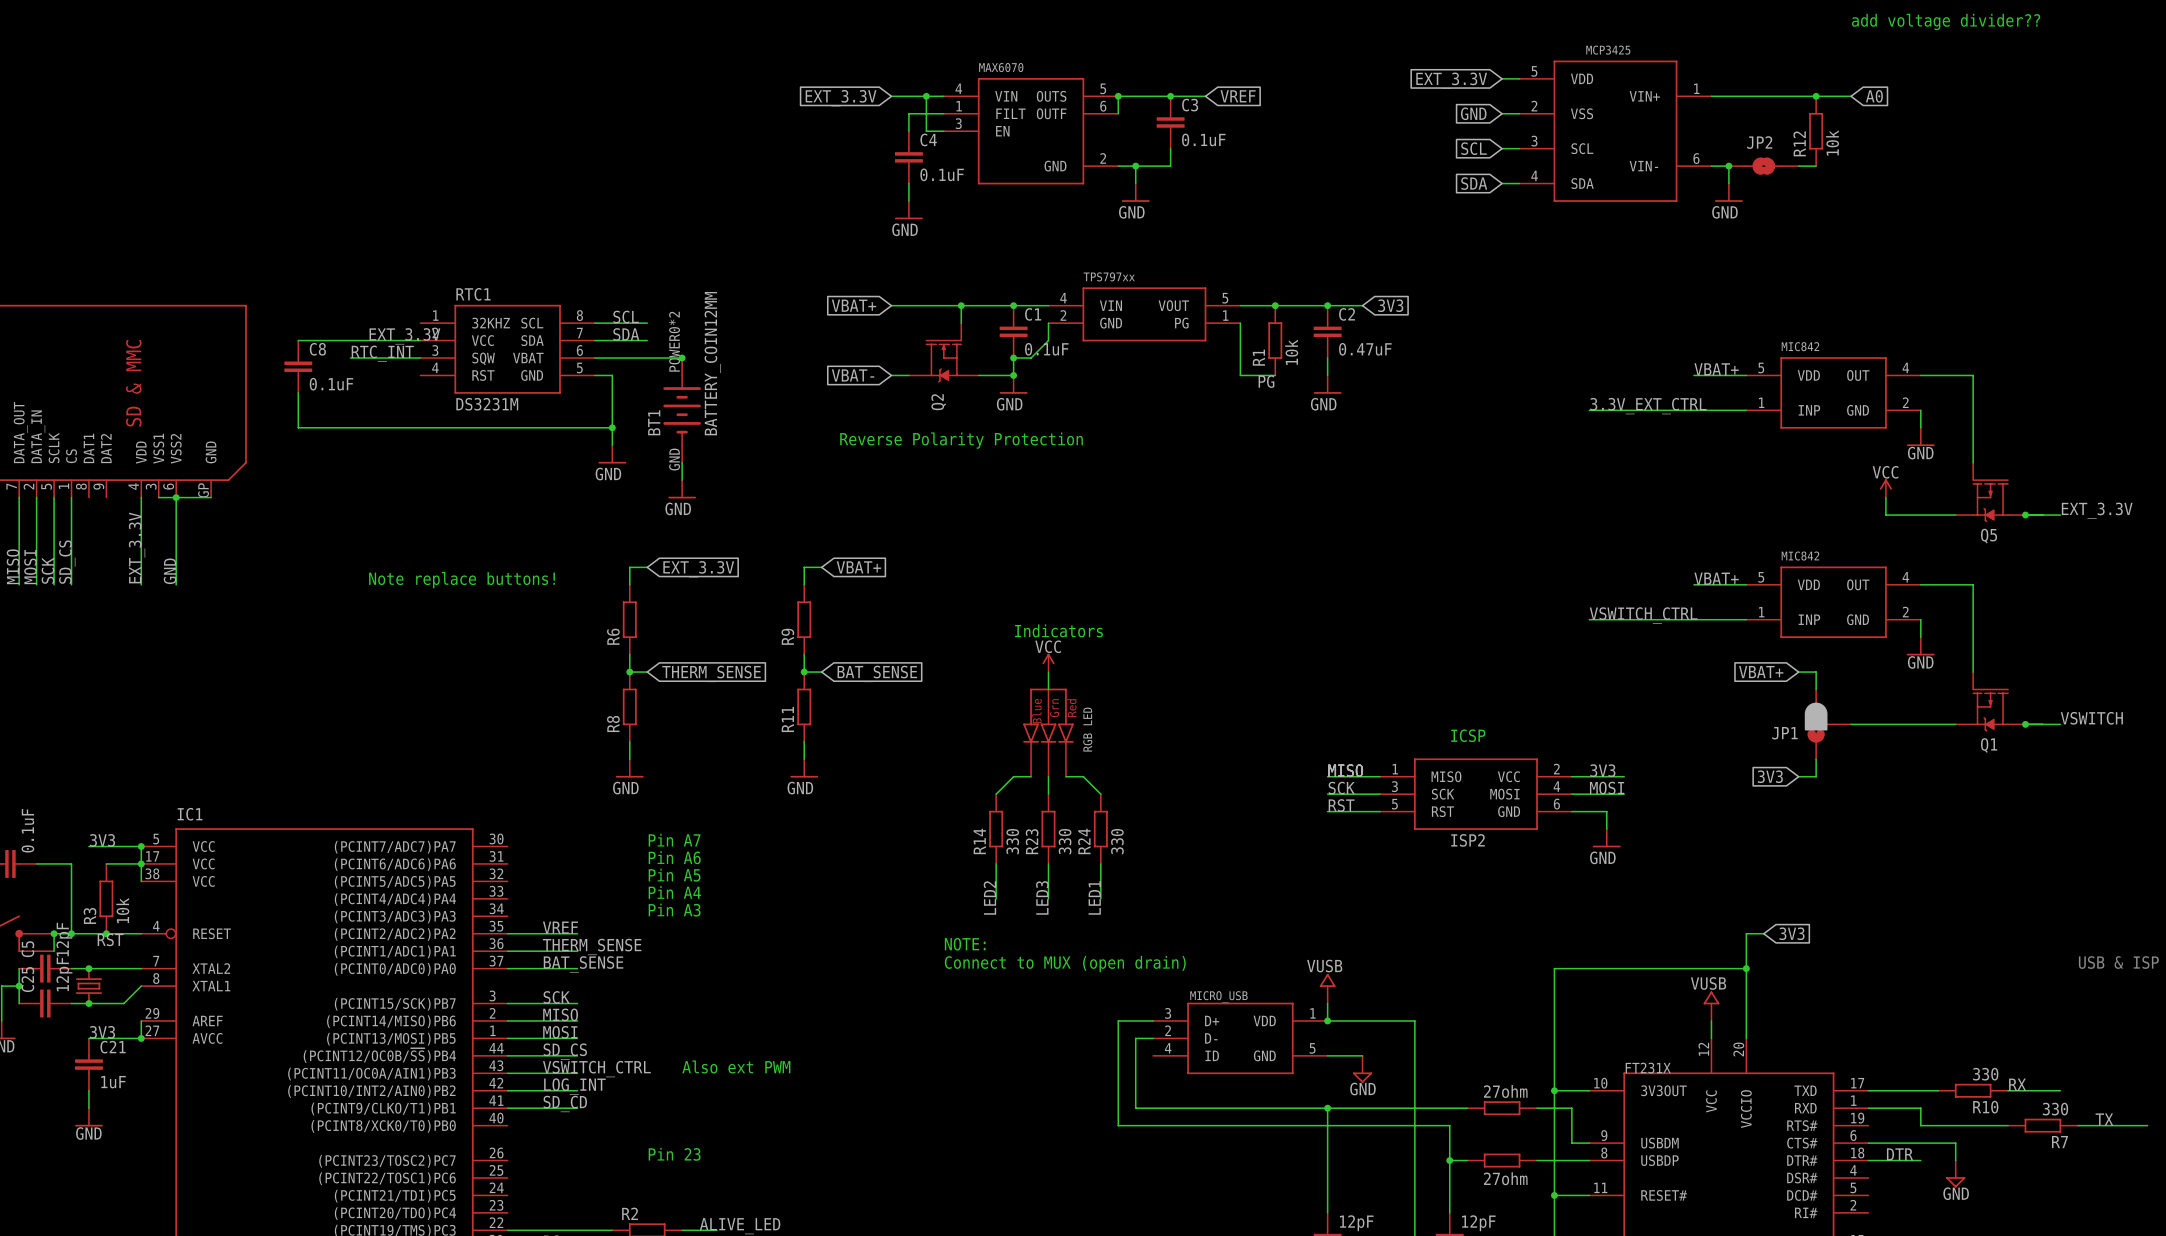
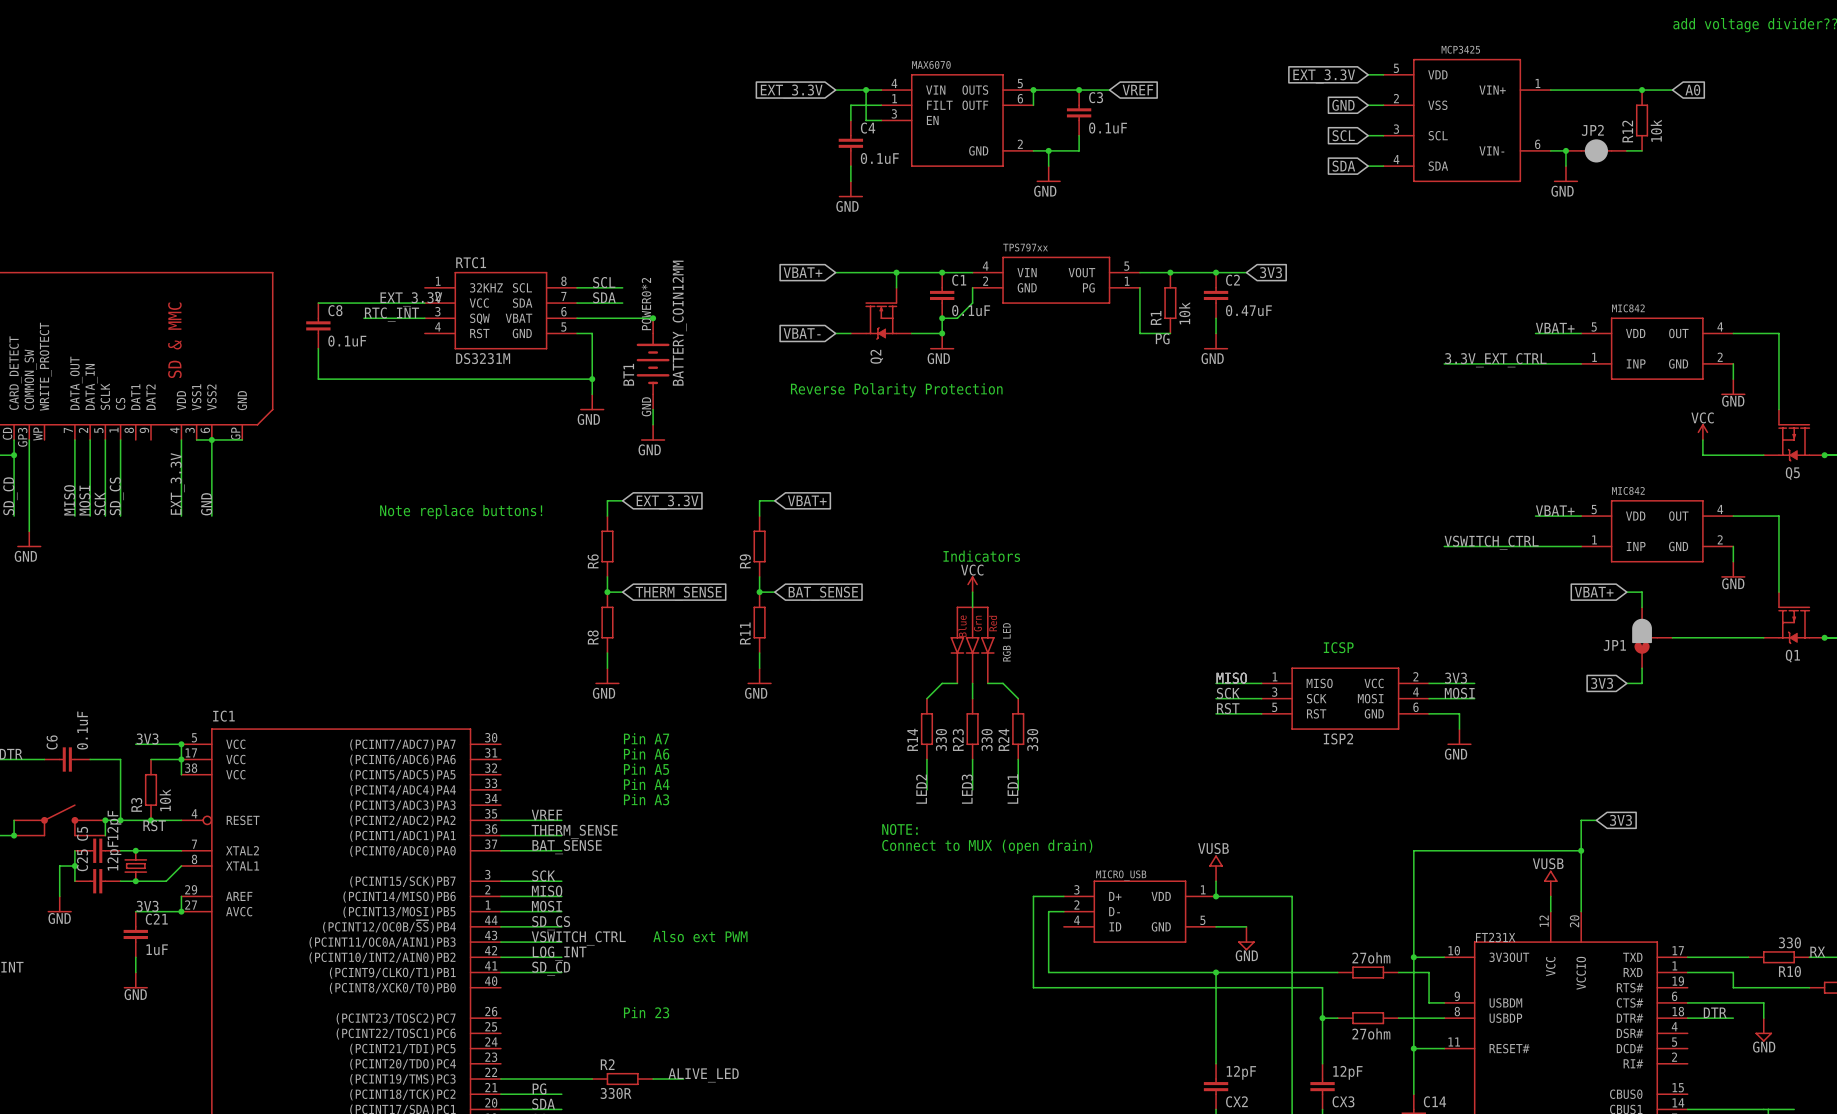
JP2 symbol: [1728, 157, 1799, 175] -> [1565, 139, 1627, 163]

